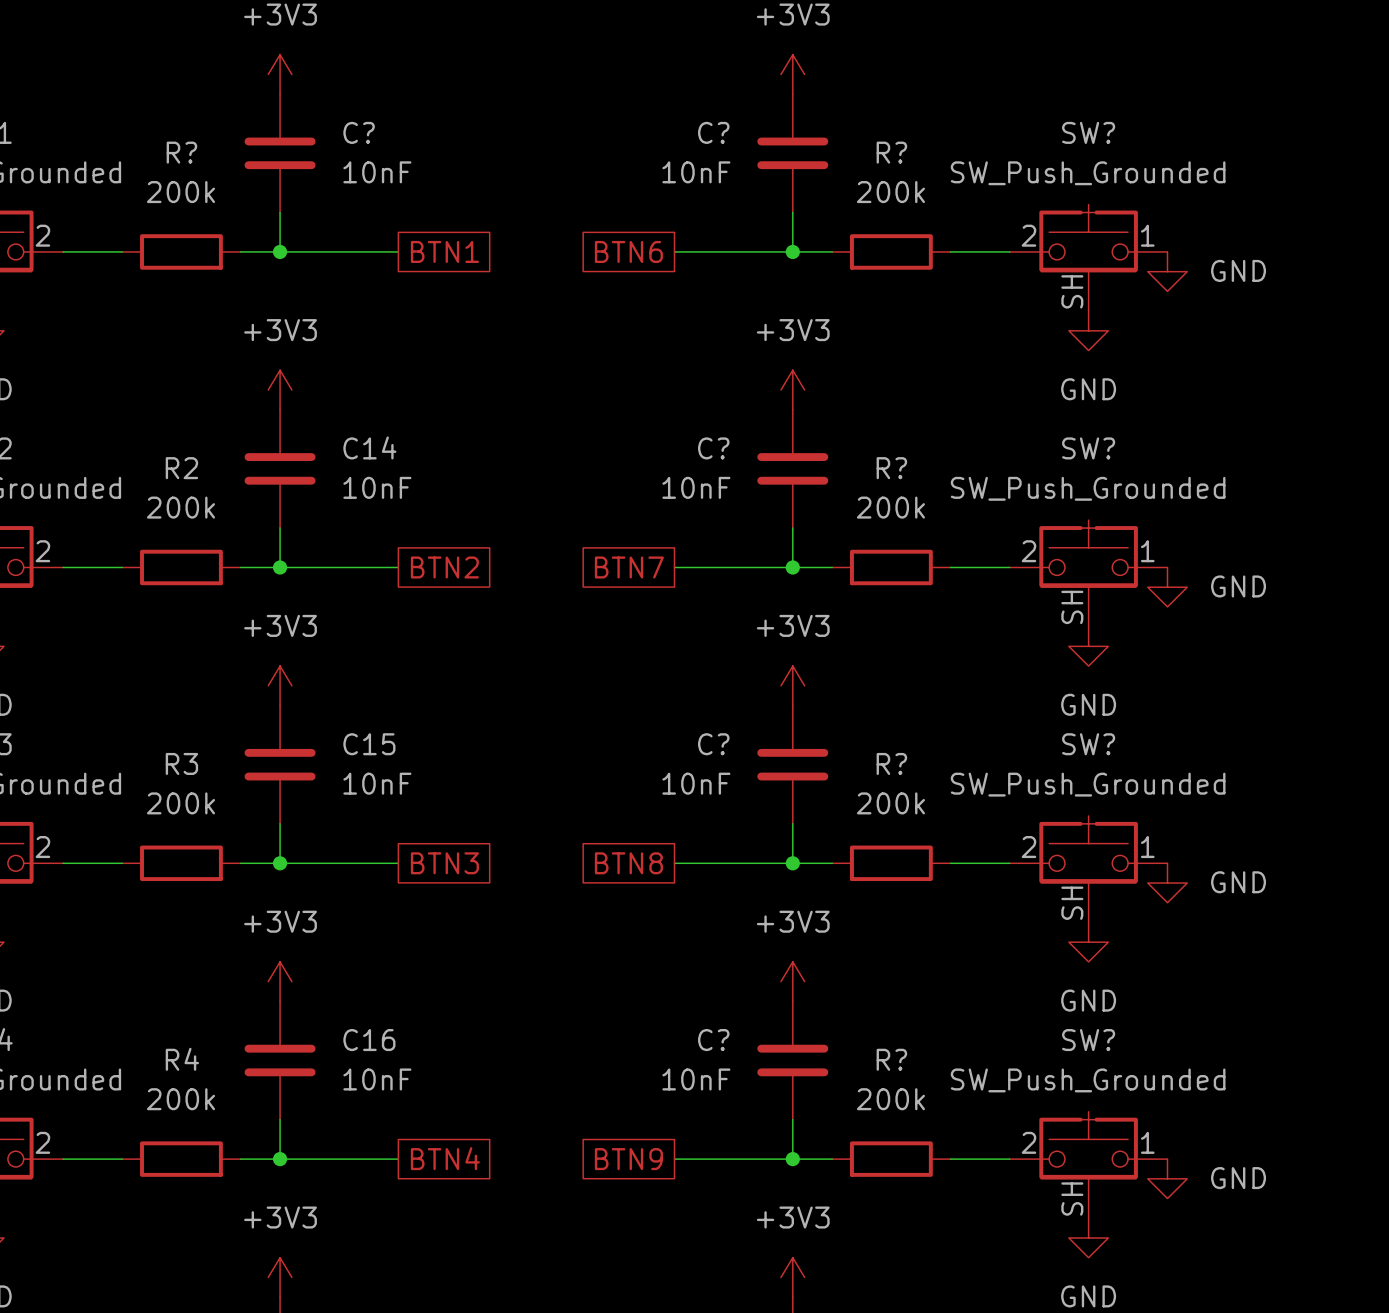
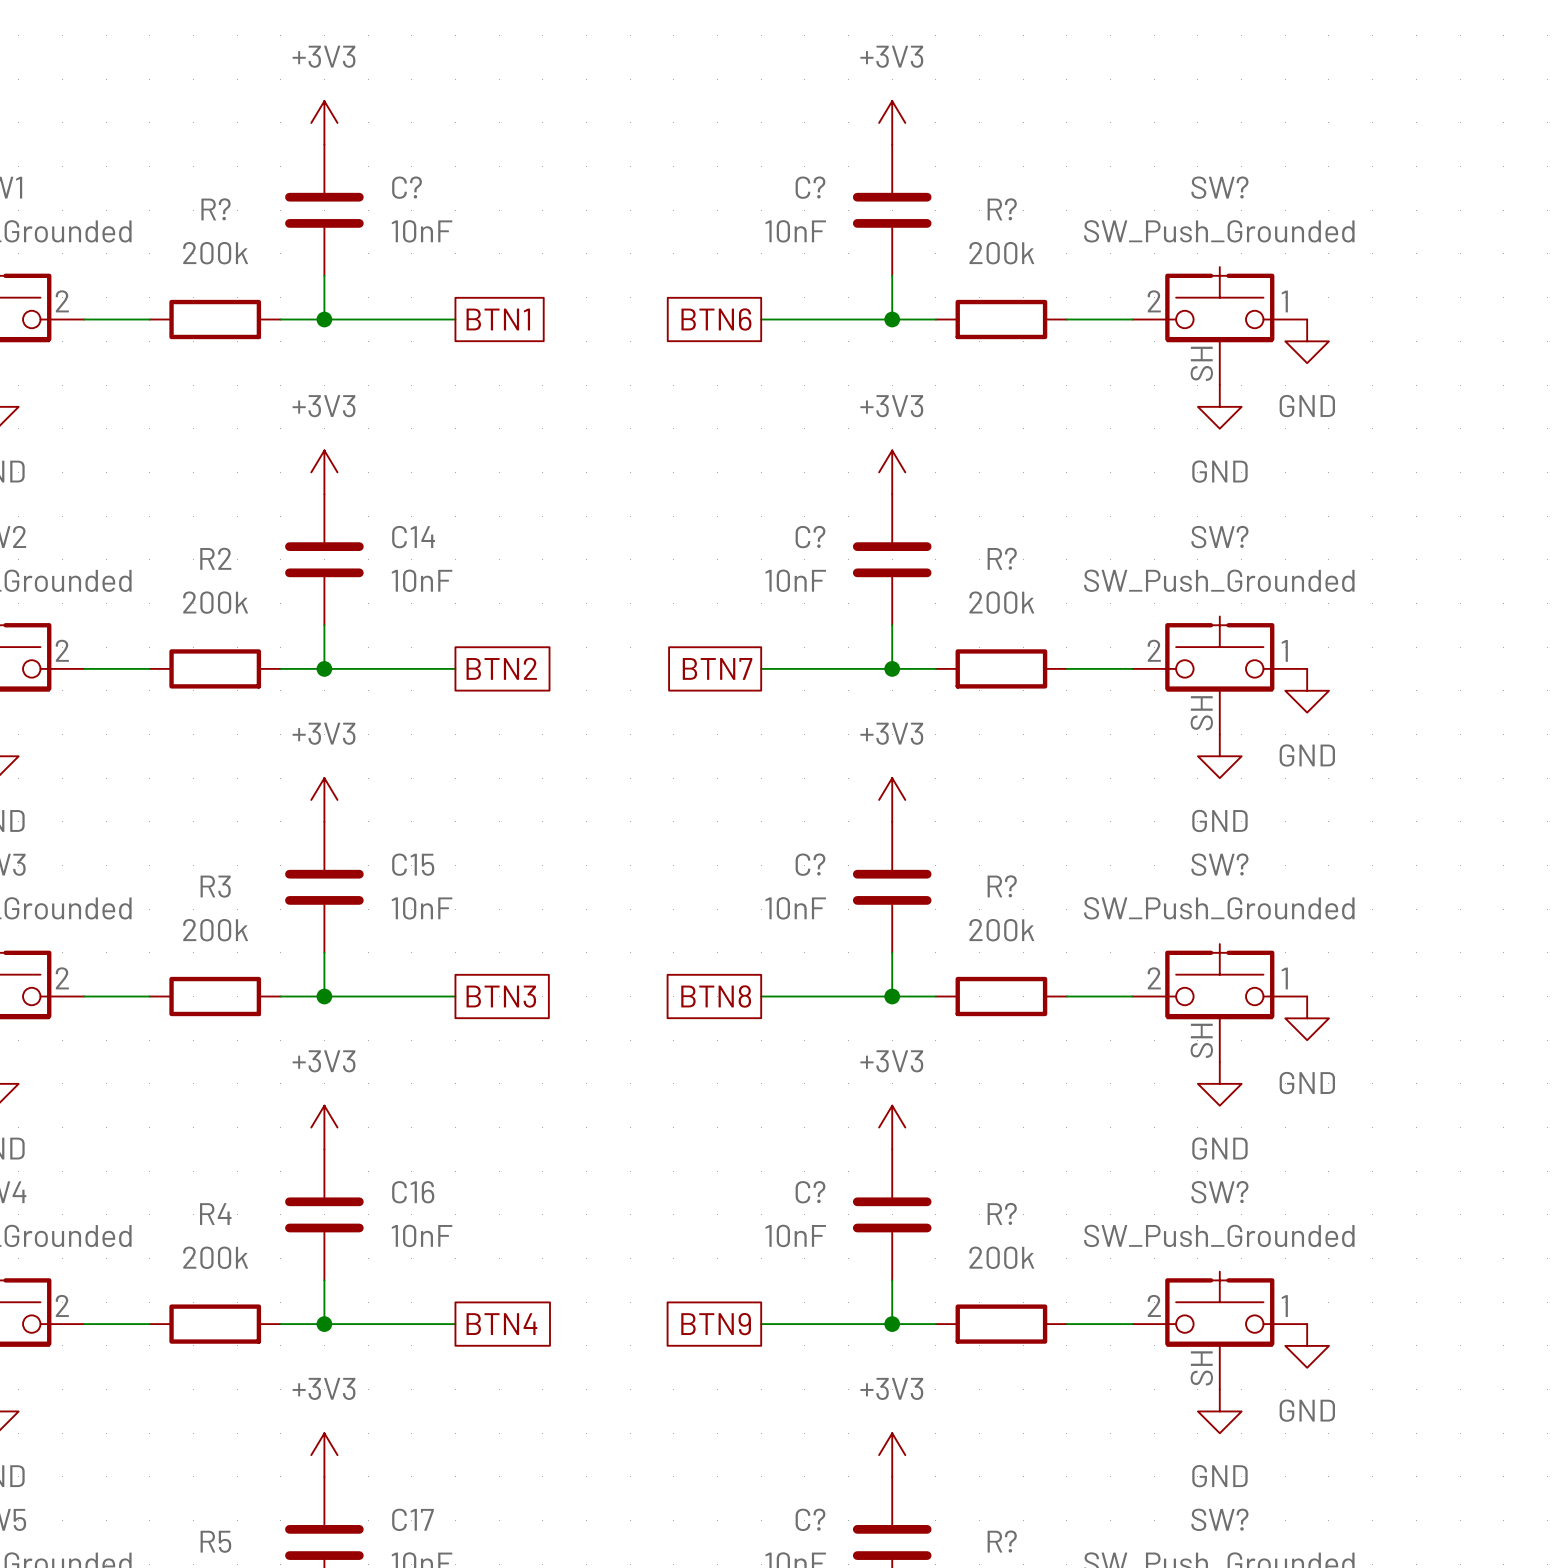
power symbol text position: GND (1238, 270) -> GND (1307, 406)
power symbol text position: GND (1238, 586) -> GND (1307, 755)
power symbol text position: GND (1238, 882) -> GND (1307, 1083)
power symbol text position: GND (1238, 1178) -> GND (1307, 1410)

